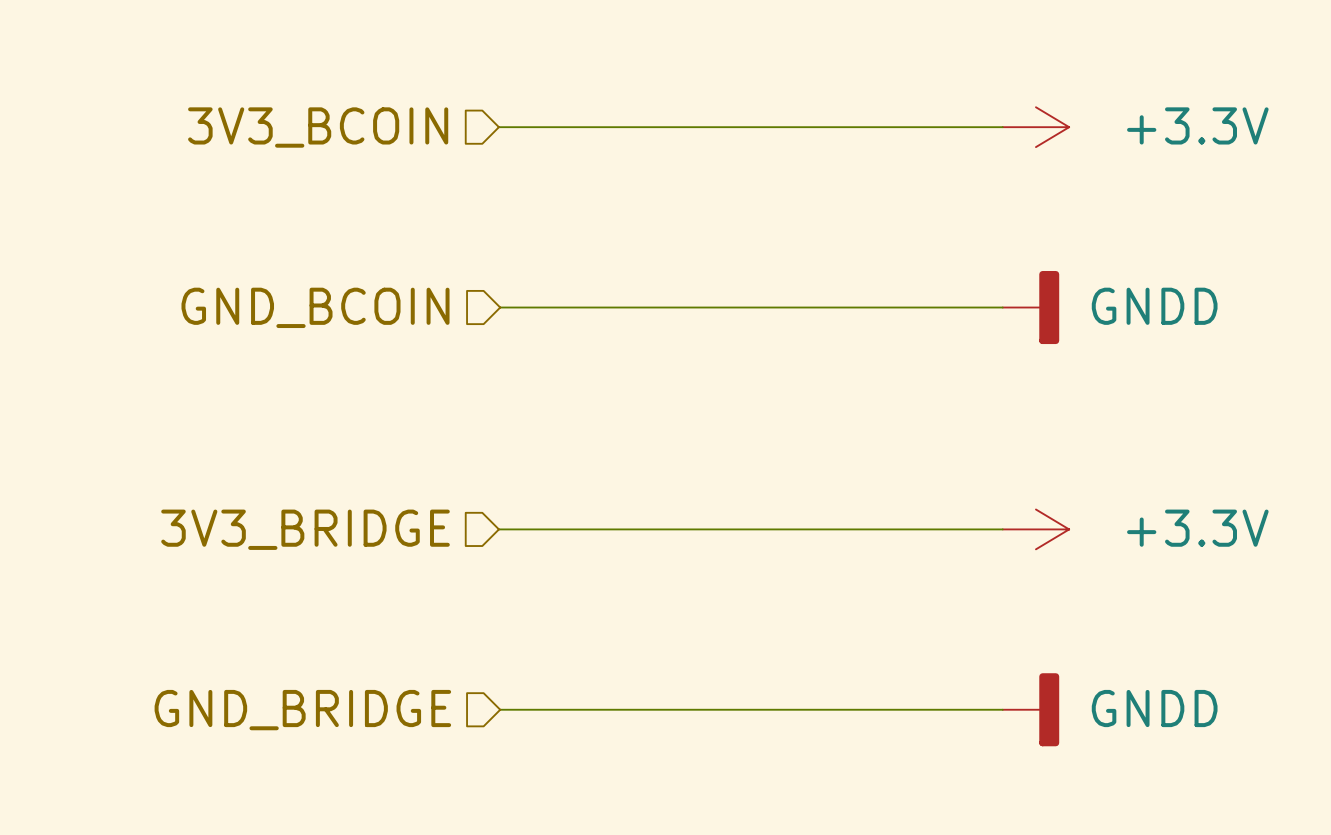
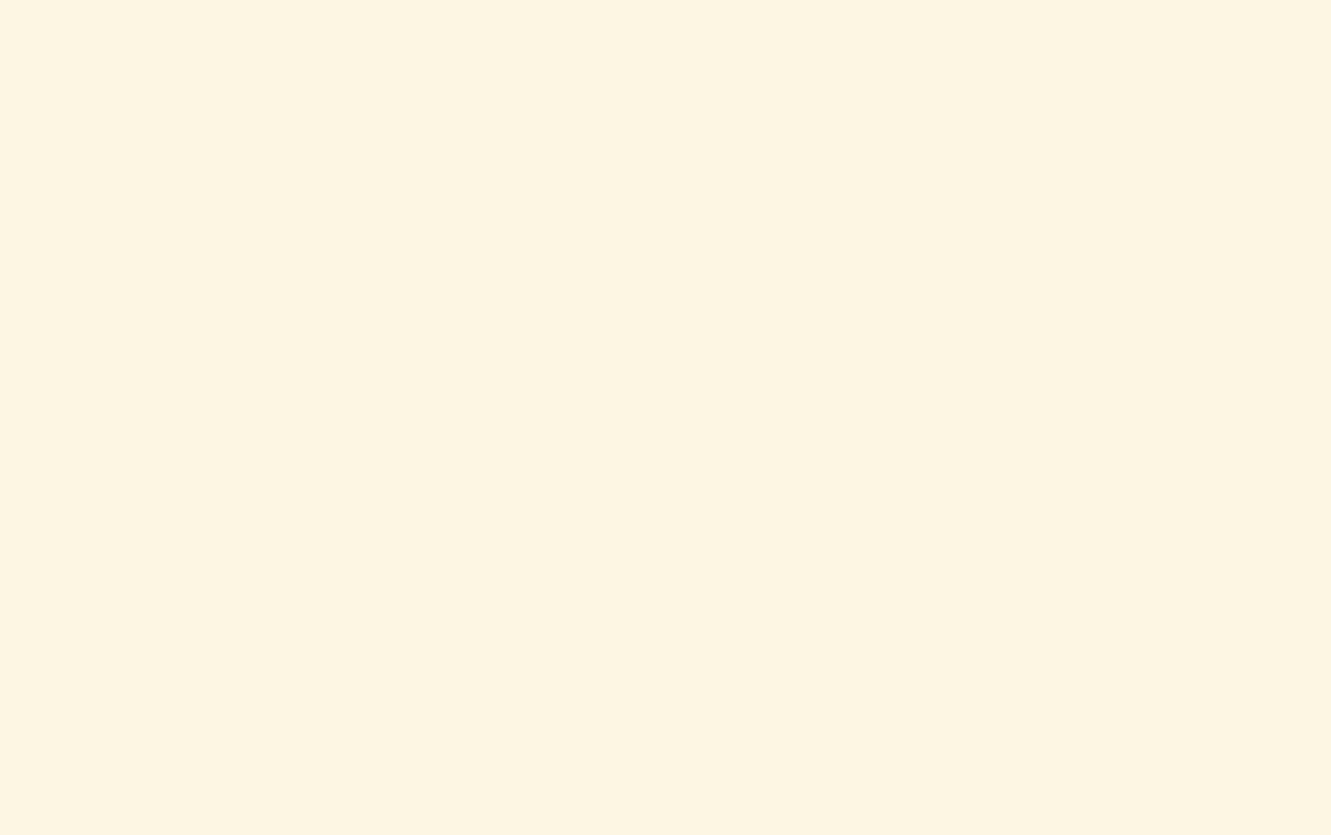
hierarchical label: 3V3_BCOIN (318, 127) -> none
wire: (498, 127) (1002, 127) -> none
power symbol: +3.3V (1035, 127) -> none
hierarchical label: GND_BCOIN (315, 307) -> none
wire: (500, 307) (1002, 307) -> none
power symbol: GNDD (1030, 307) -> none
hierarchical label: 3V3_BRIDGE (305, 529) -> none
wire: (498, 529) (1002, 529) -> none
power symbol: +3.3V (1035, 529) -> none
wire: (500, 709) (1002, 709) -> none
power symbol: GNDD (1030, 709) -> none
hierarchical label: GND_BRIDGE (302, 710) -> none

